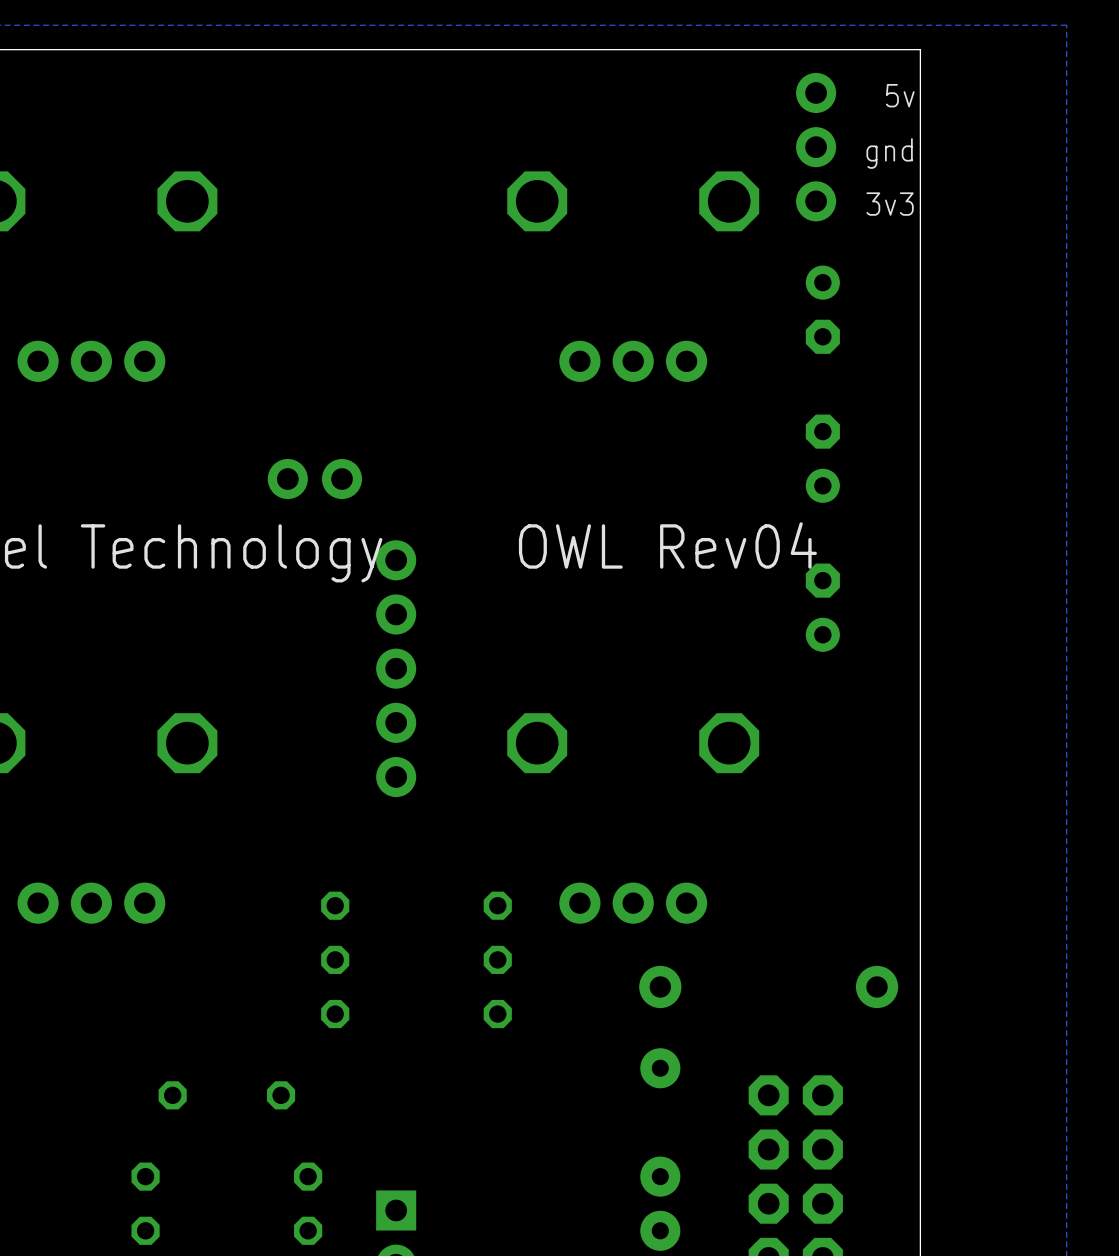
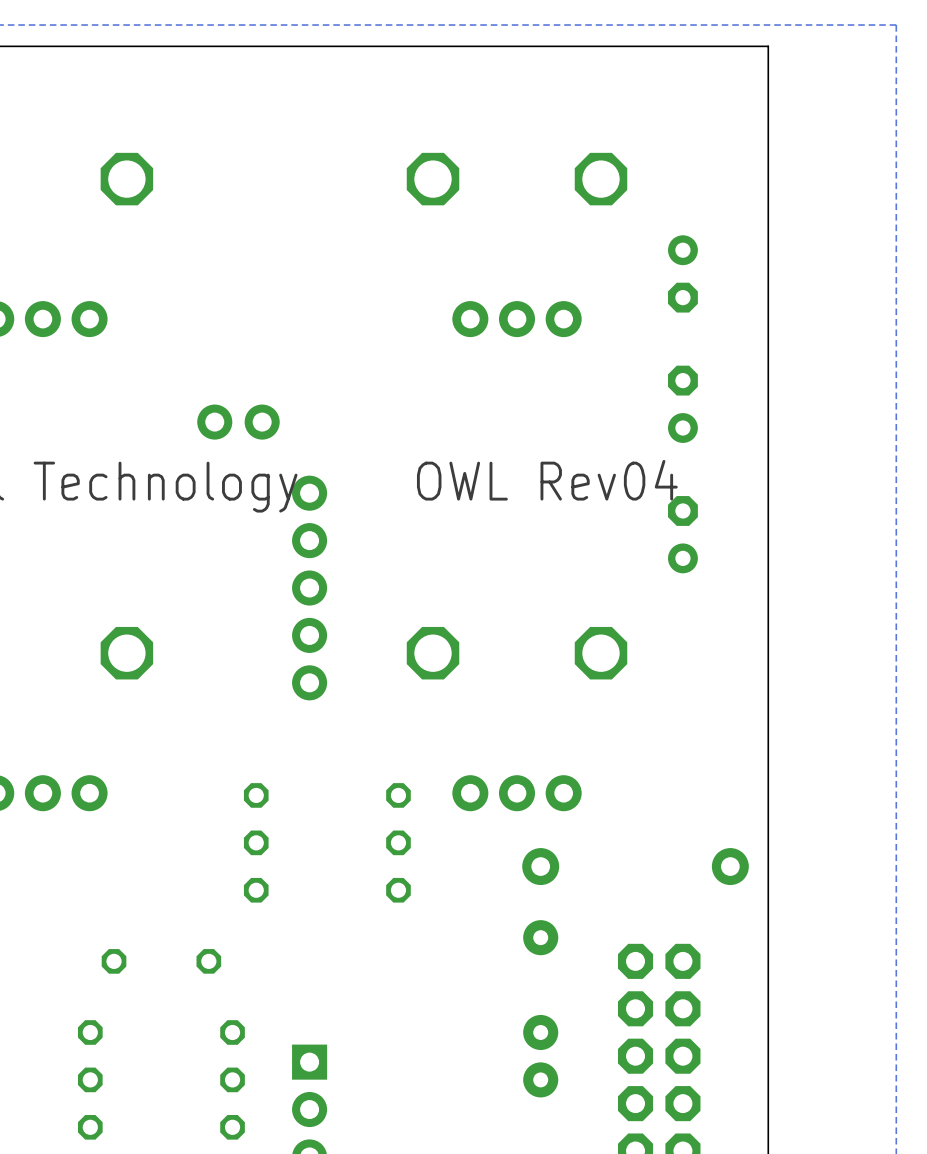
text: 5v (900, 95) -> none
part: (816, 147) -> none
text: gnd (889, 153) -> none
text: 3v3 (890, 204) -> none

